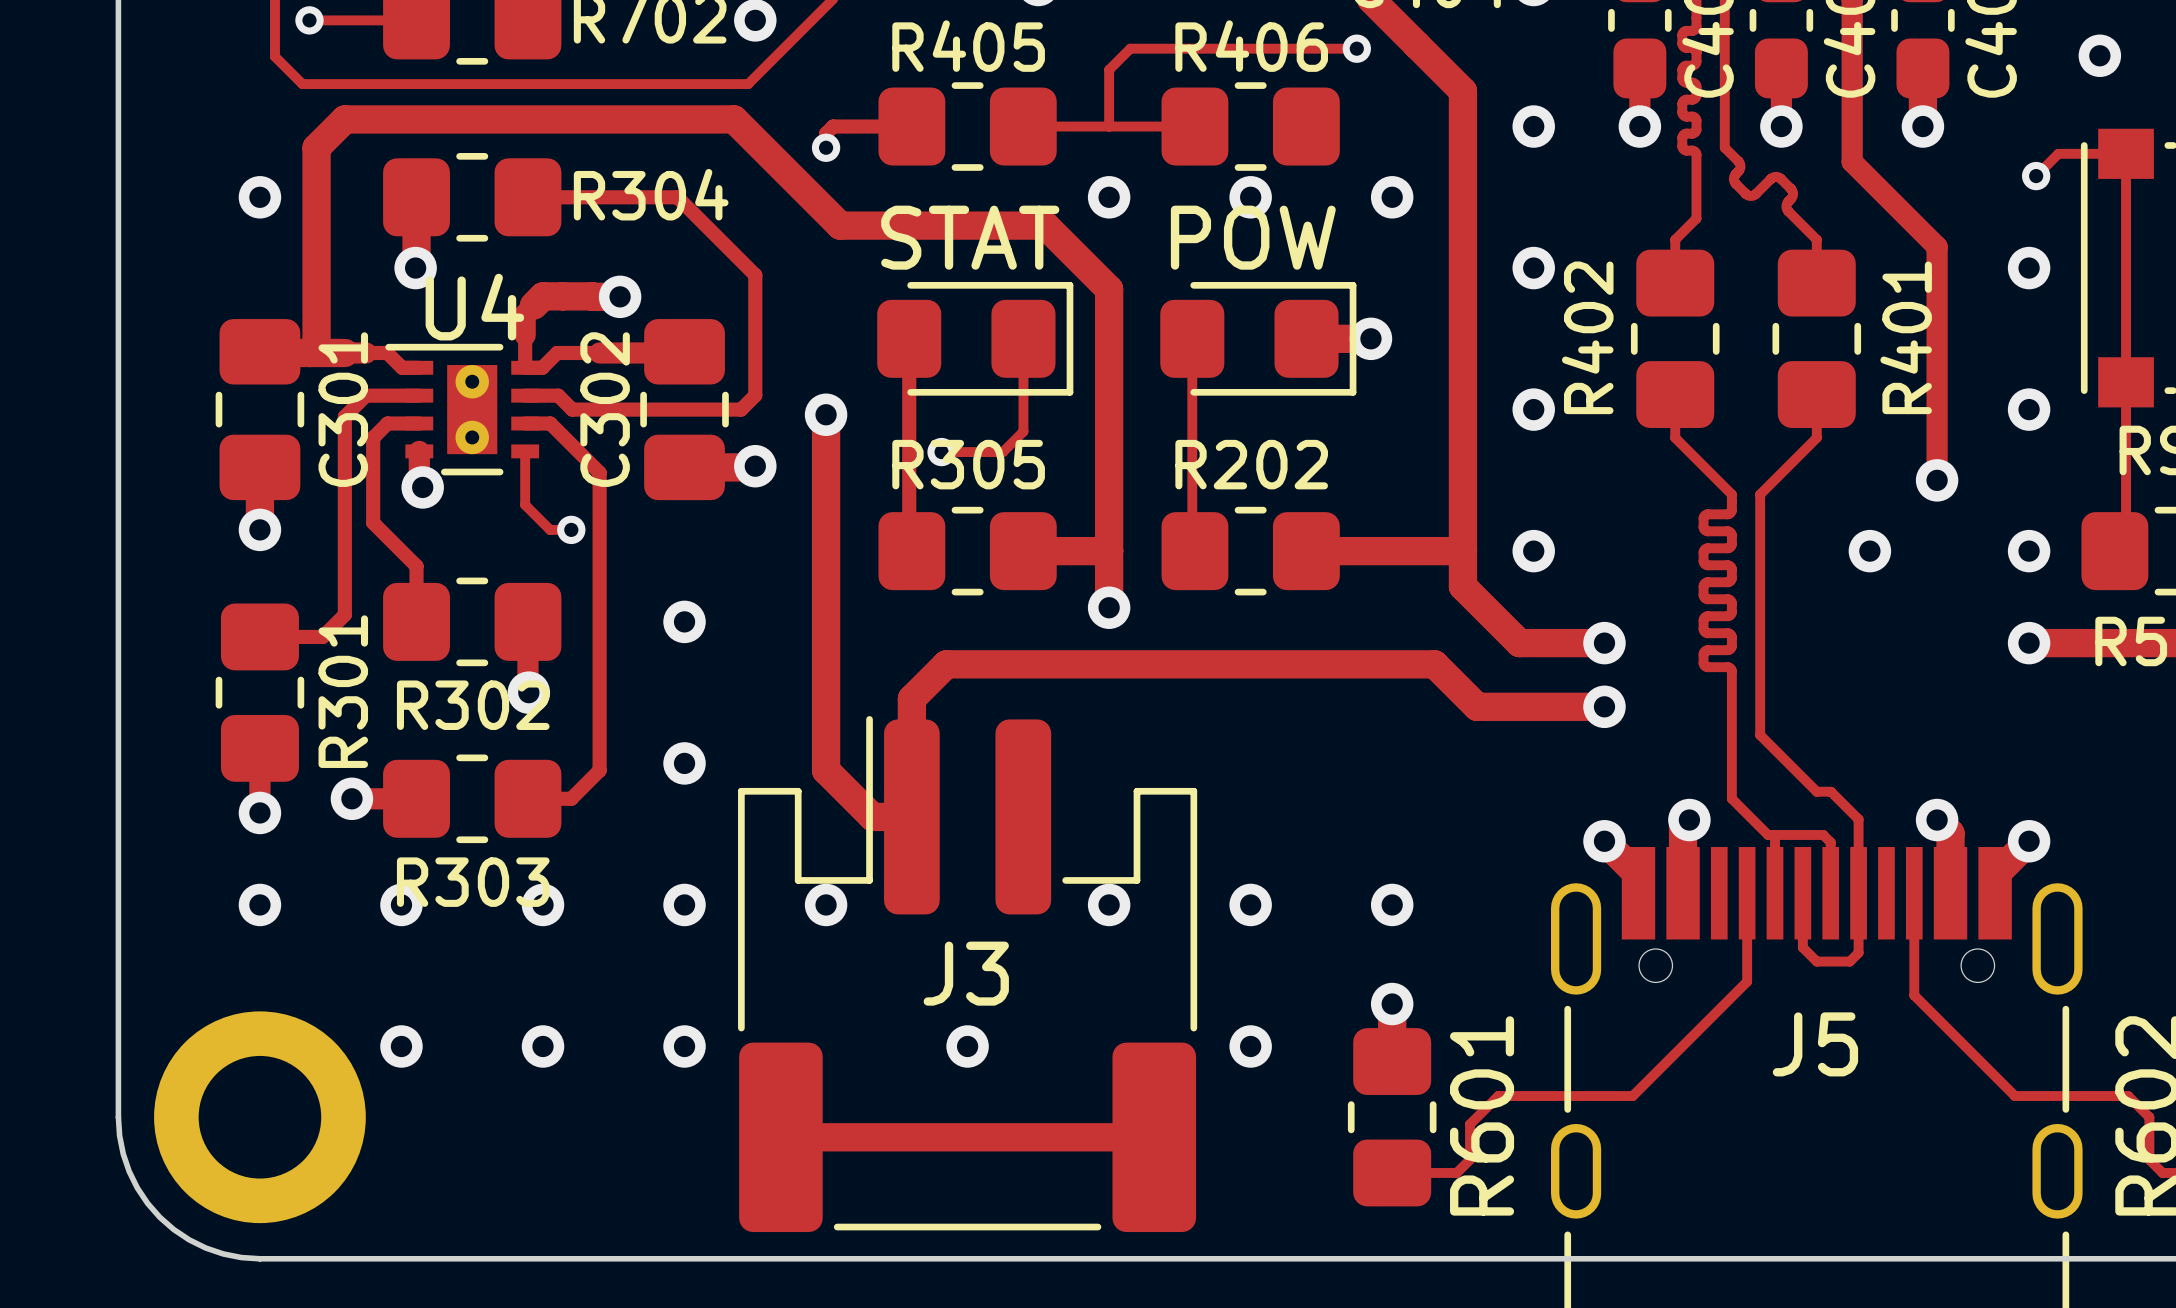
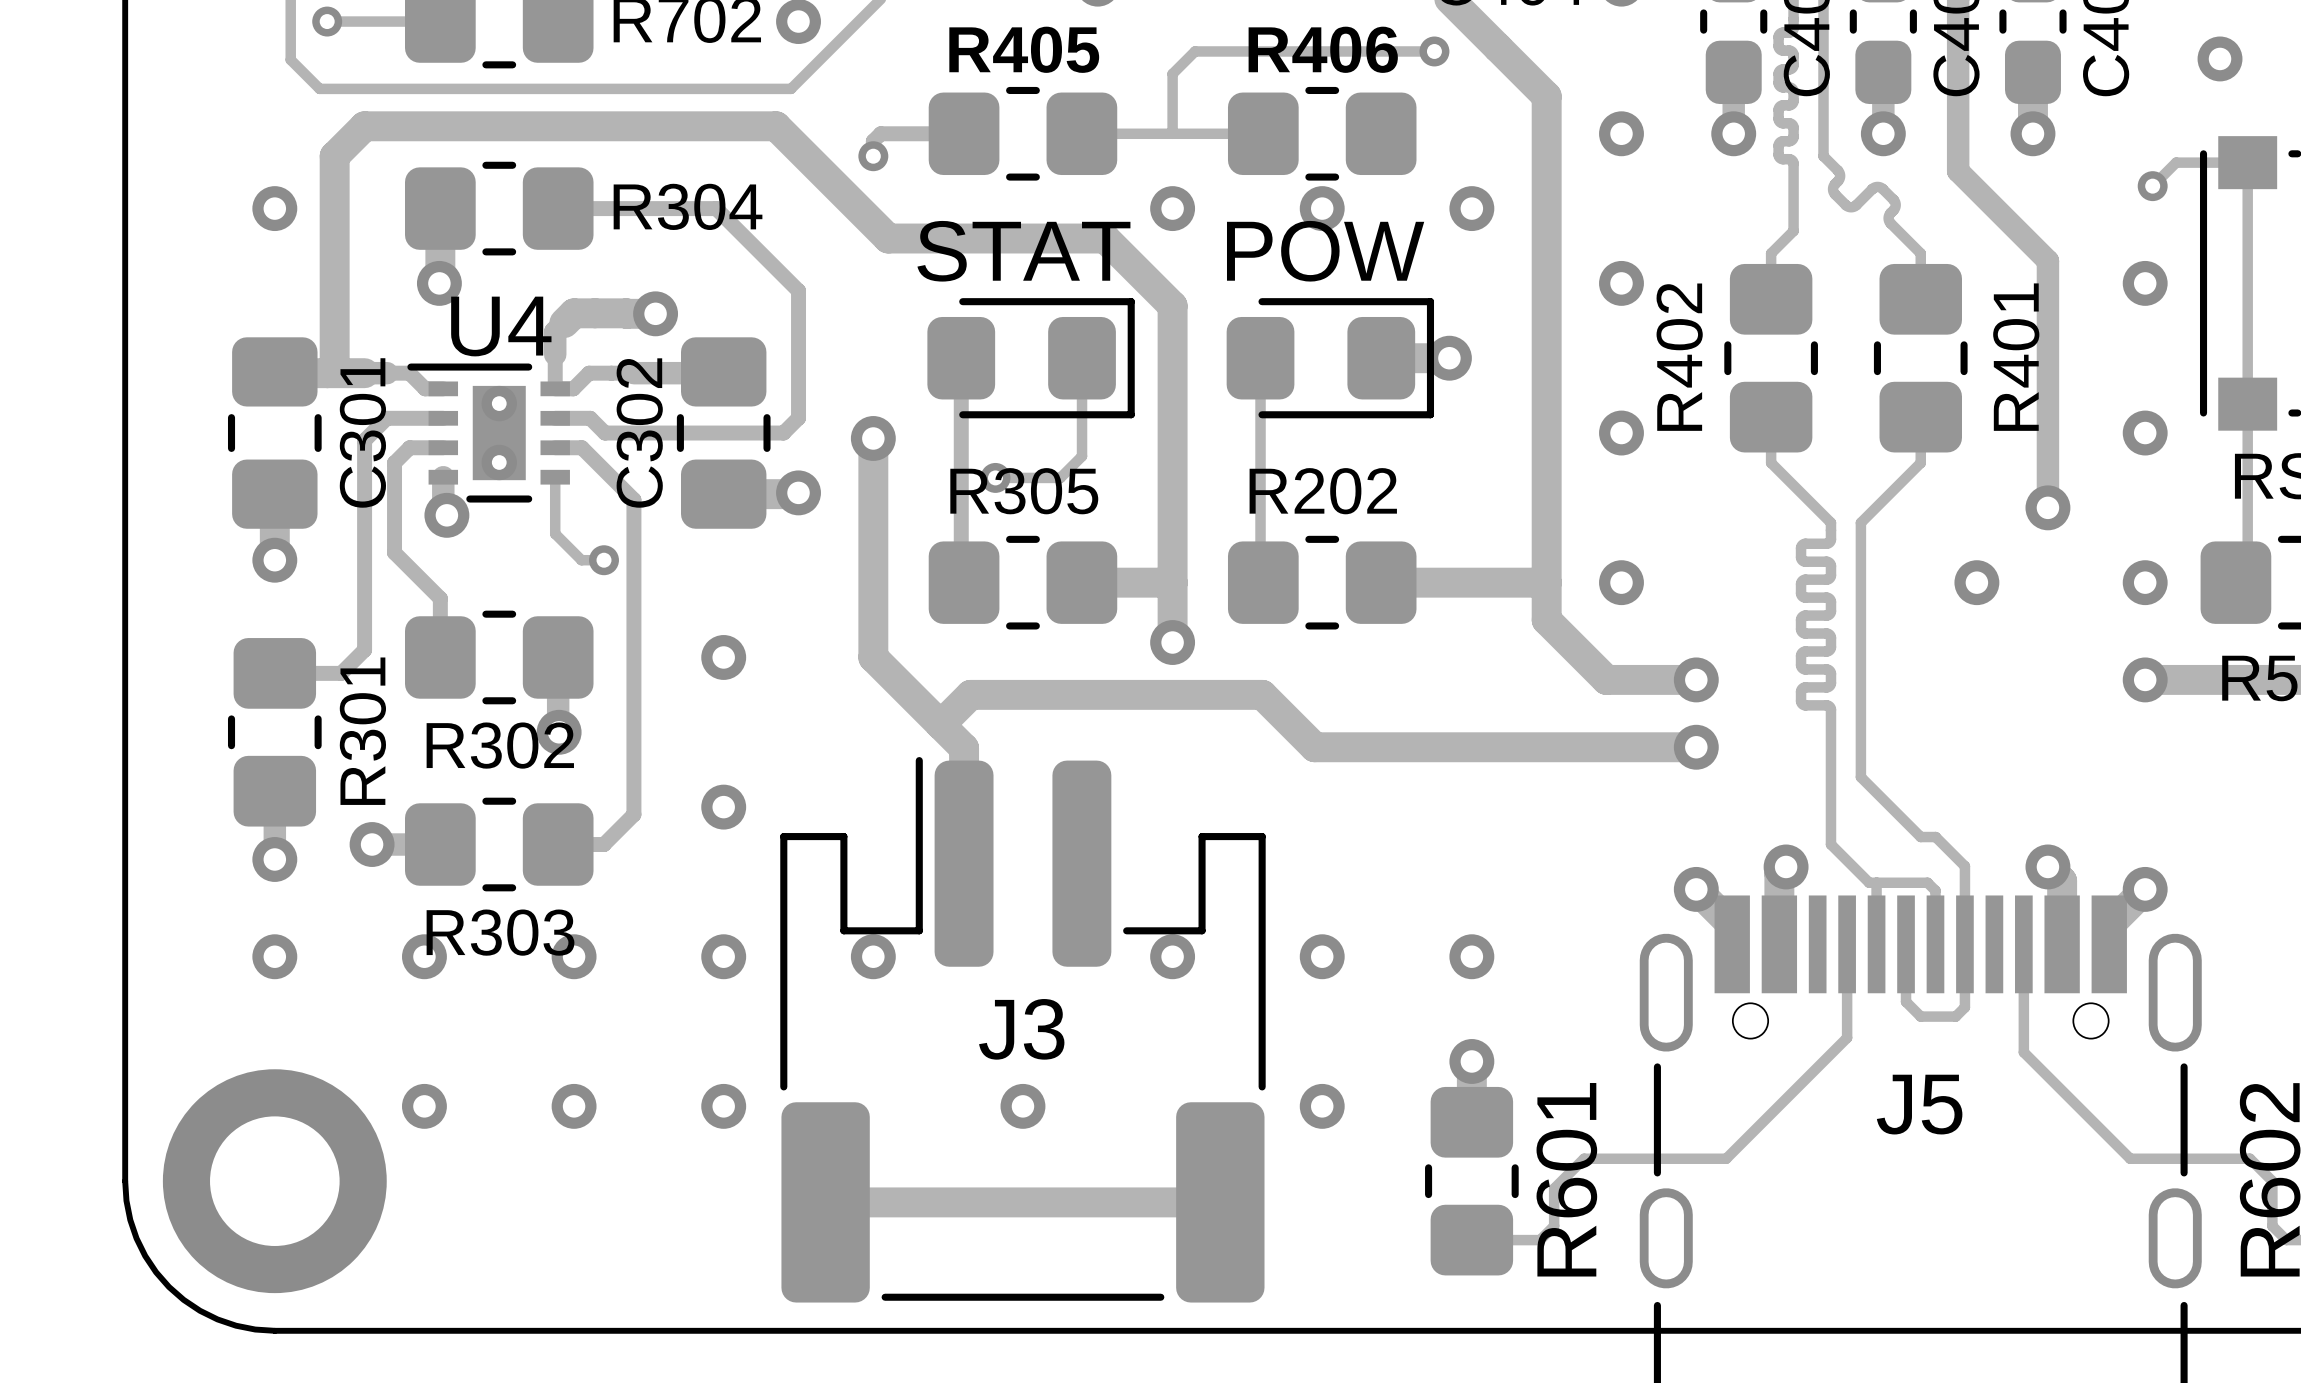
track: (826, 621) (826, 770) (872, 816) (911, 816) -> (873, 657) (964, 748)
track: (1477, 706) (1434, 664) (946, 664) (911, 698) (911, 707) -> (1561, 747) (1314, 747) (1262, 694) (970, 694) (940, 724)

